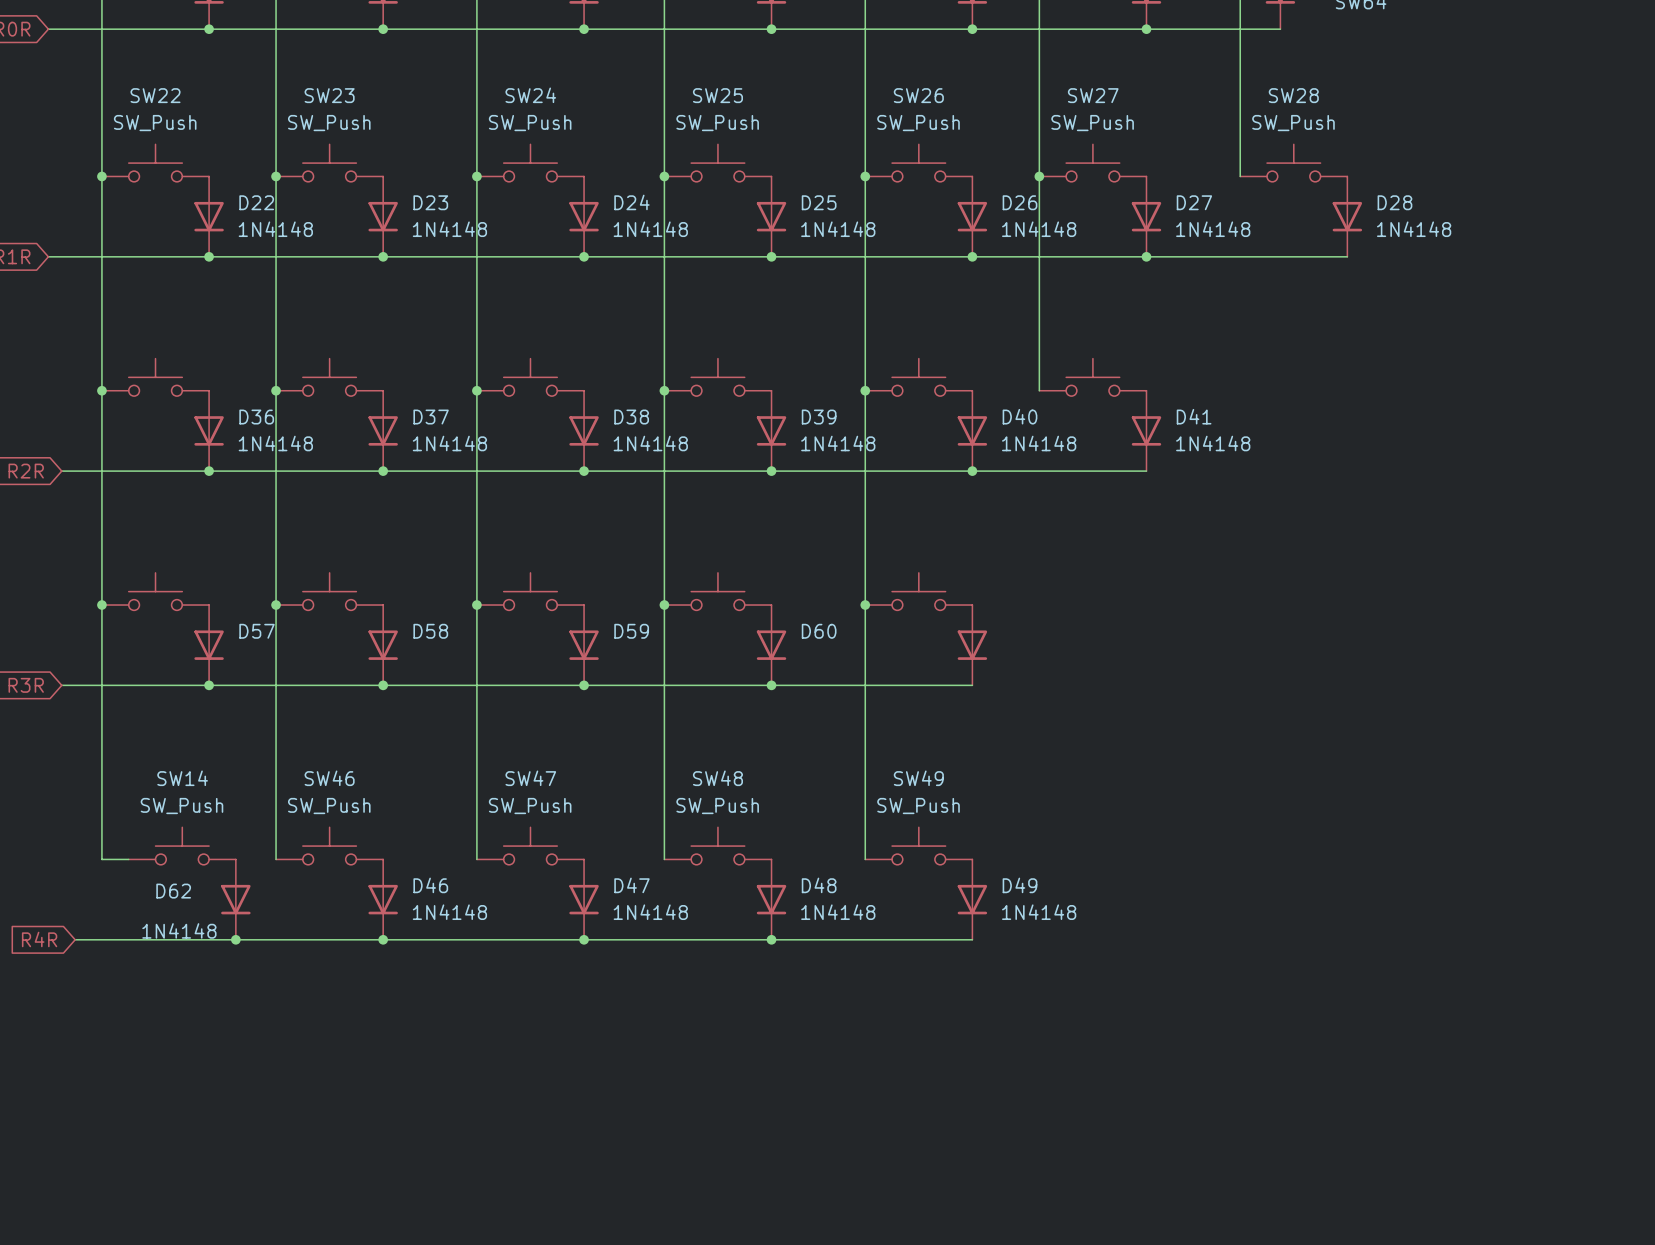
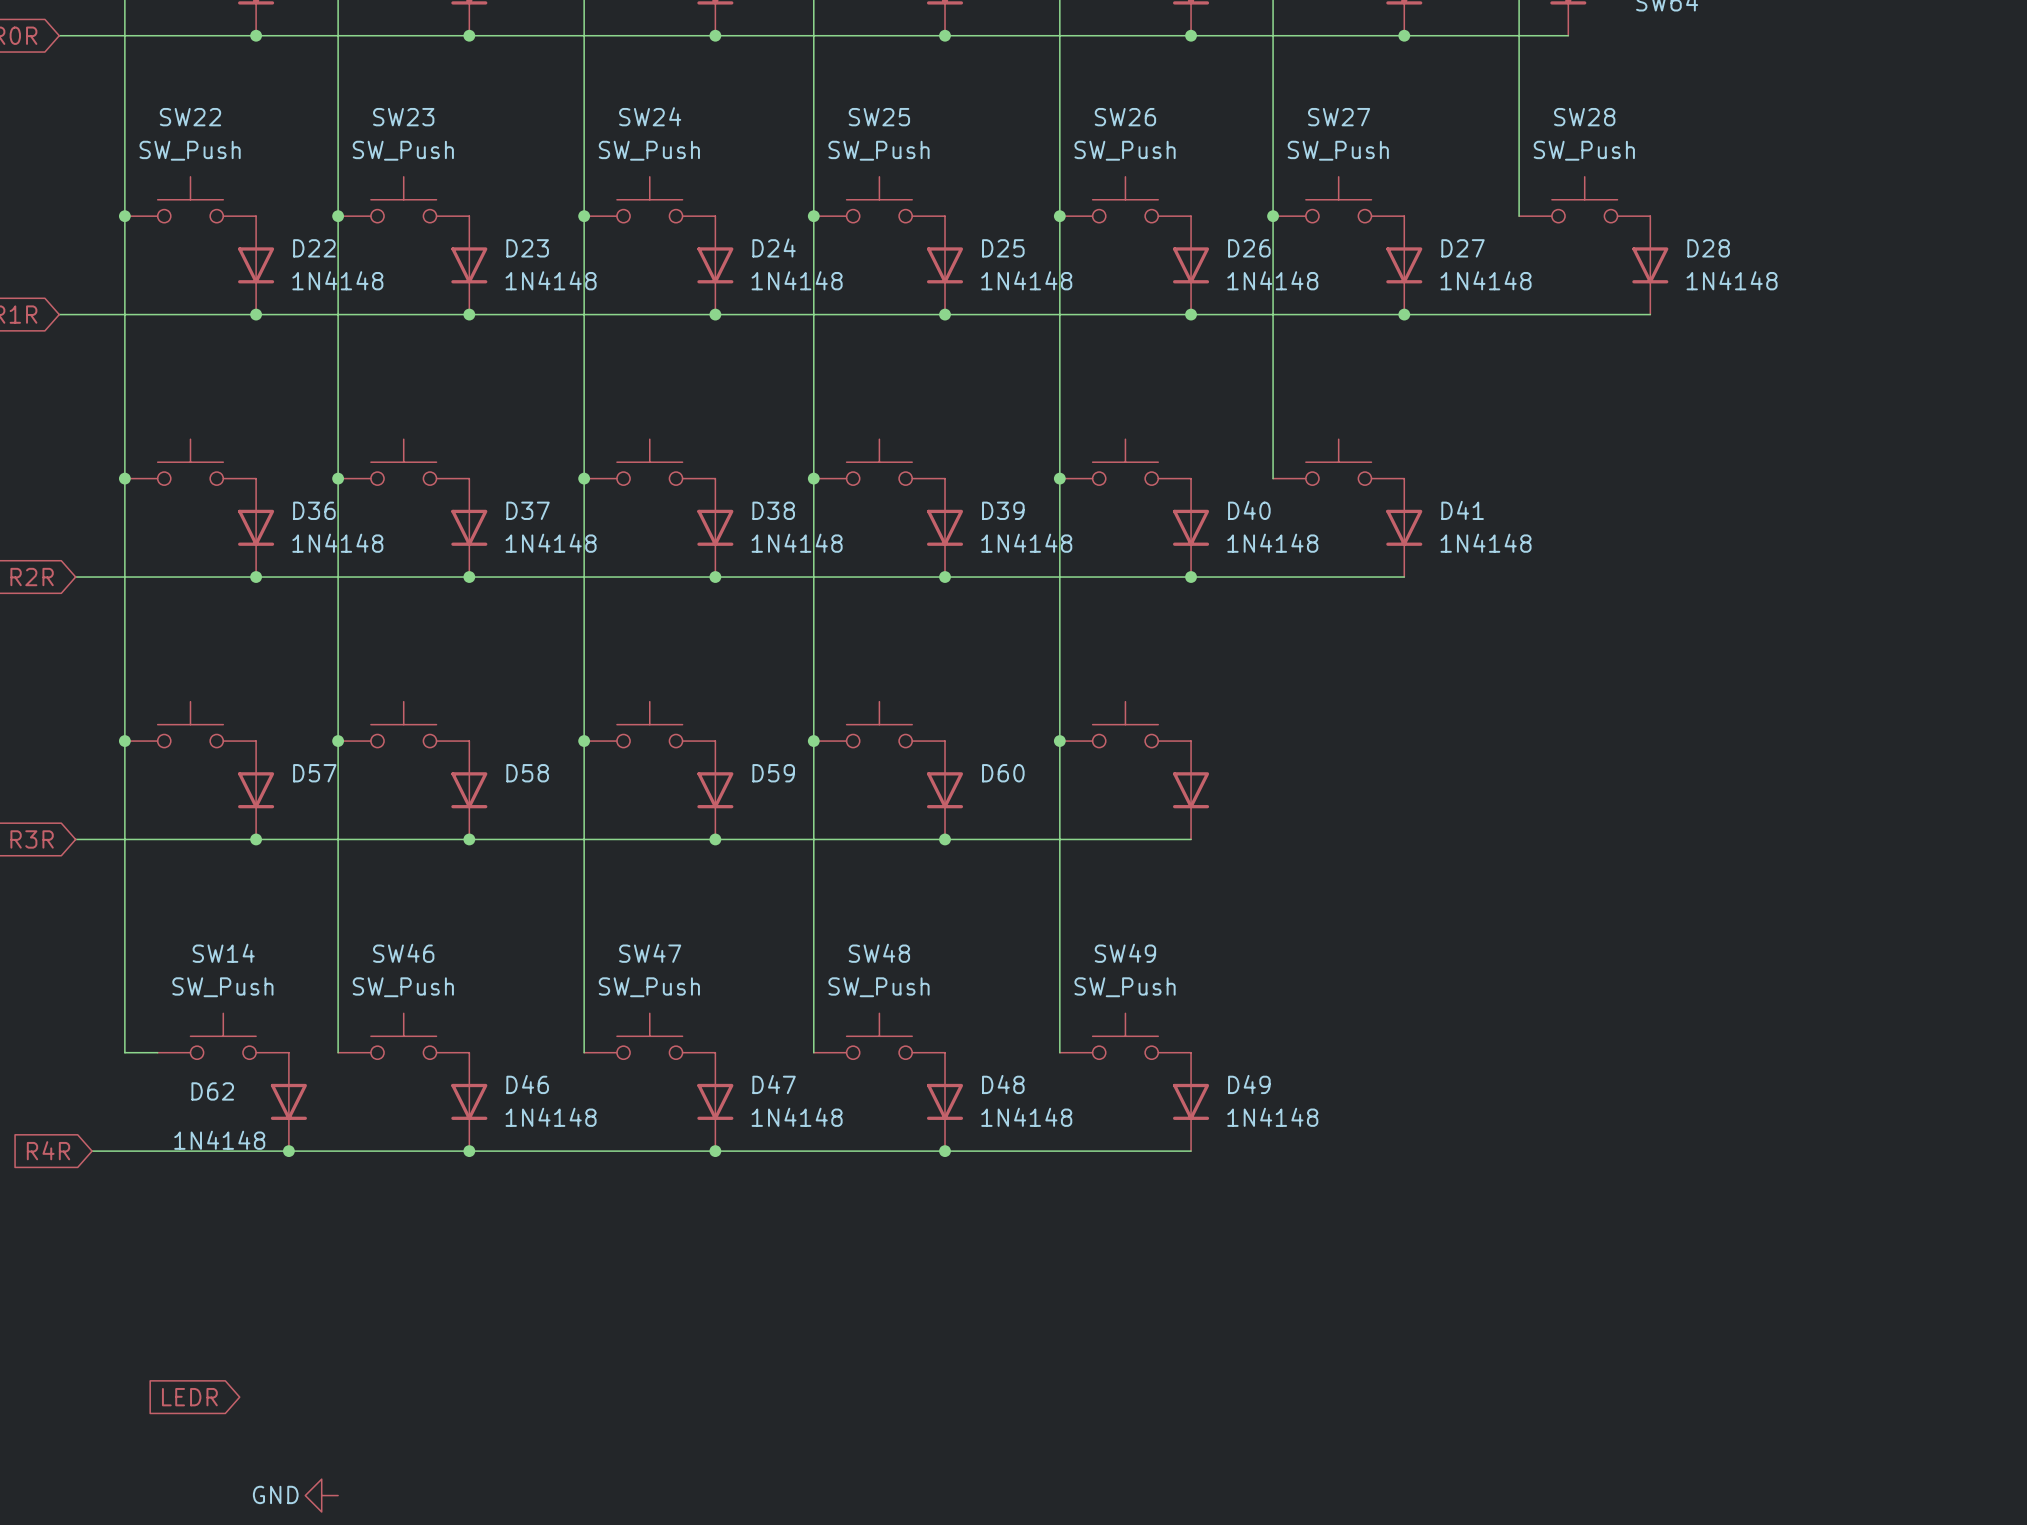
global label: none -> LEDR (189, 1397)
power symbol: none -> GND (321, 1495)

